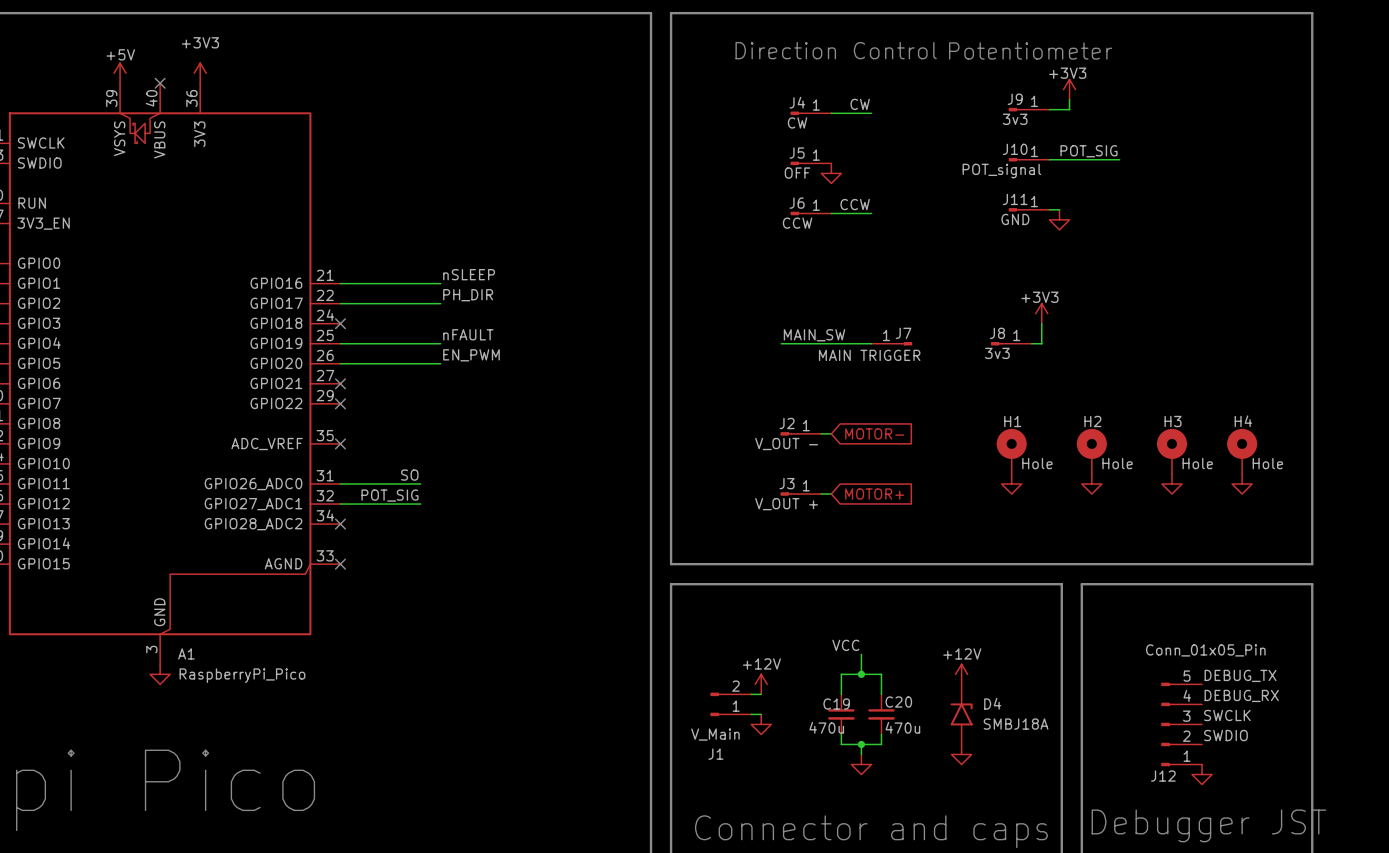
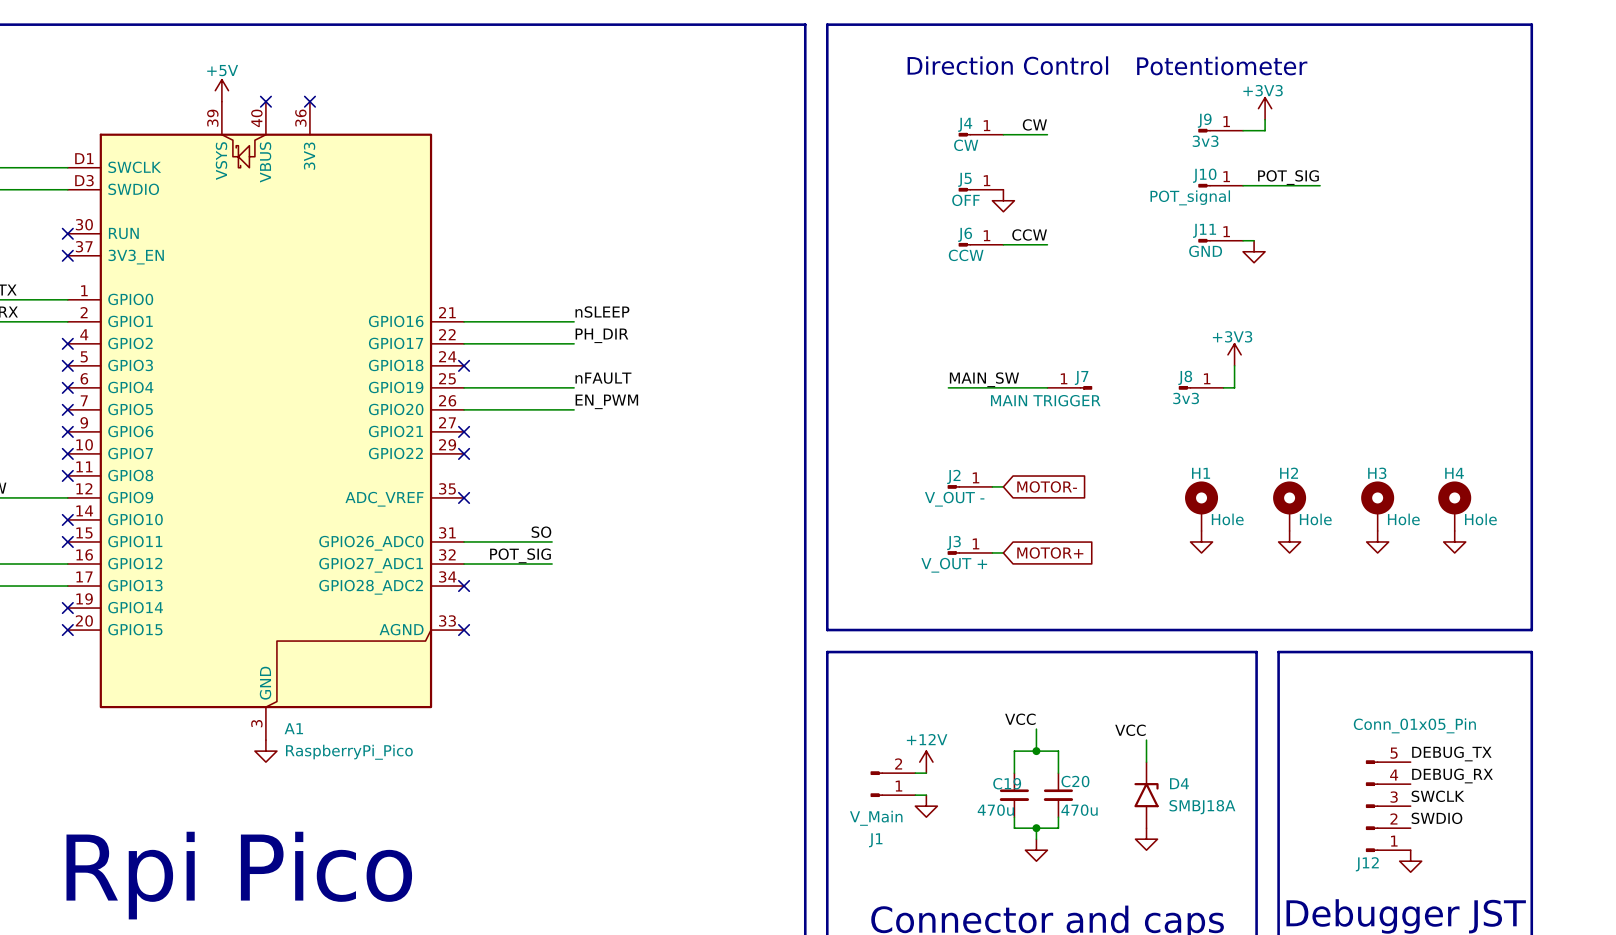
power symbol: +3V3 (200, 73) -> none
no-connect mark: none -> (309, 101)
label: none -> VCC (1130, 730)
power symbol: +12V (961, 674) -> none

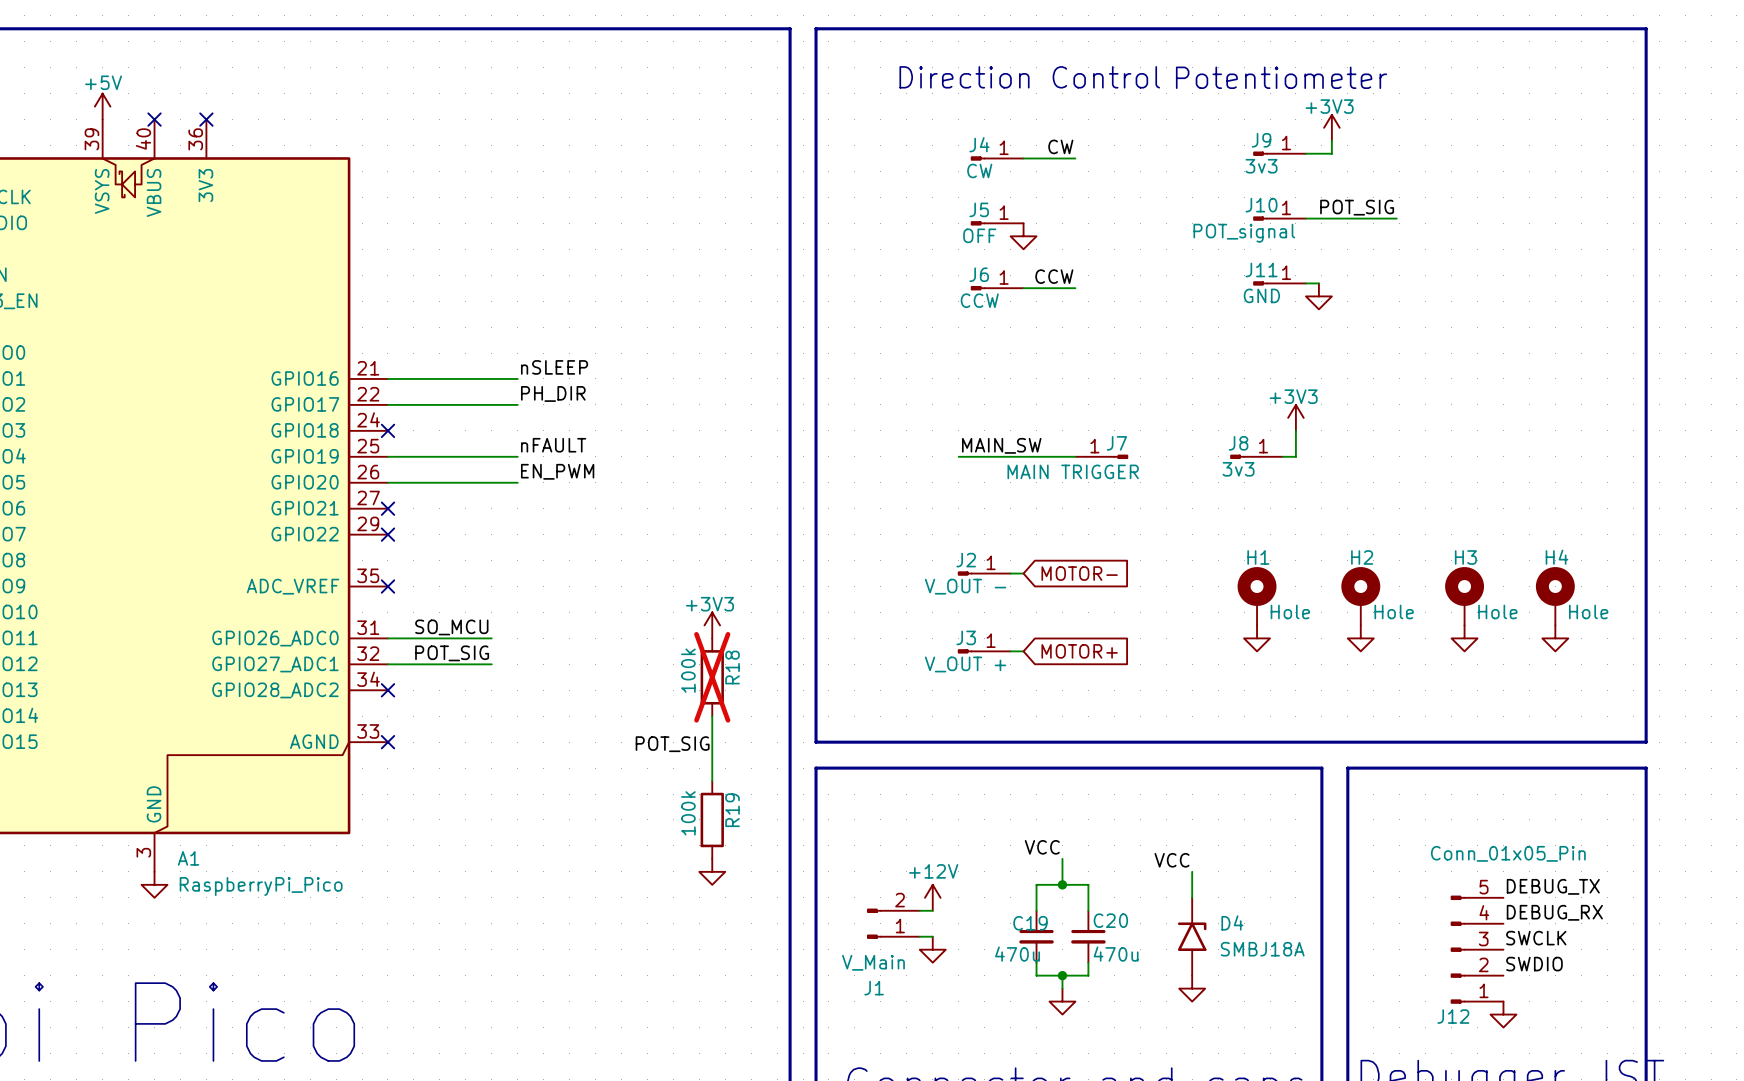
power symbol: none -> +3V3 (712, 625)
label: SO (541, 532) -> SO_MCU (451, 627)
R18: none -> 100k (712, 677)
wire: none -> (712, 716) (712, 781)
label: none -> POT_SIG (672, 744)
R19: none -> 100k (712, 819)
power symbol: none -> (712, 871)

